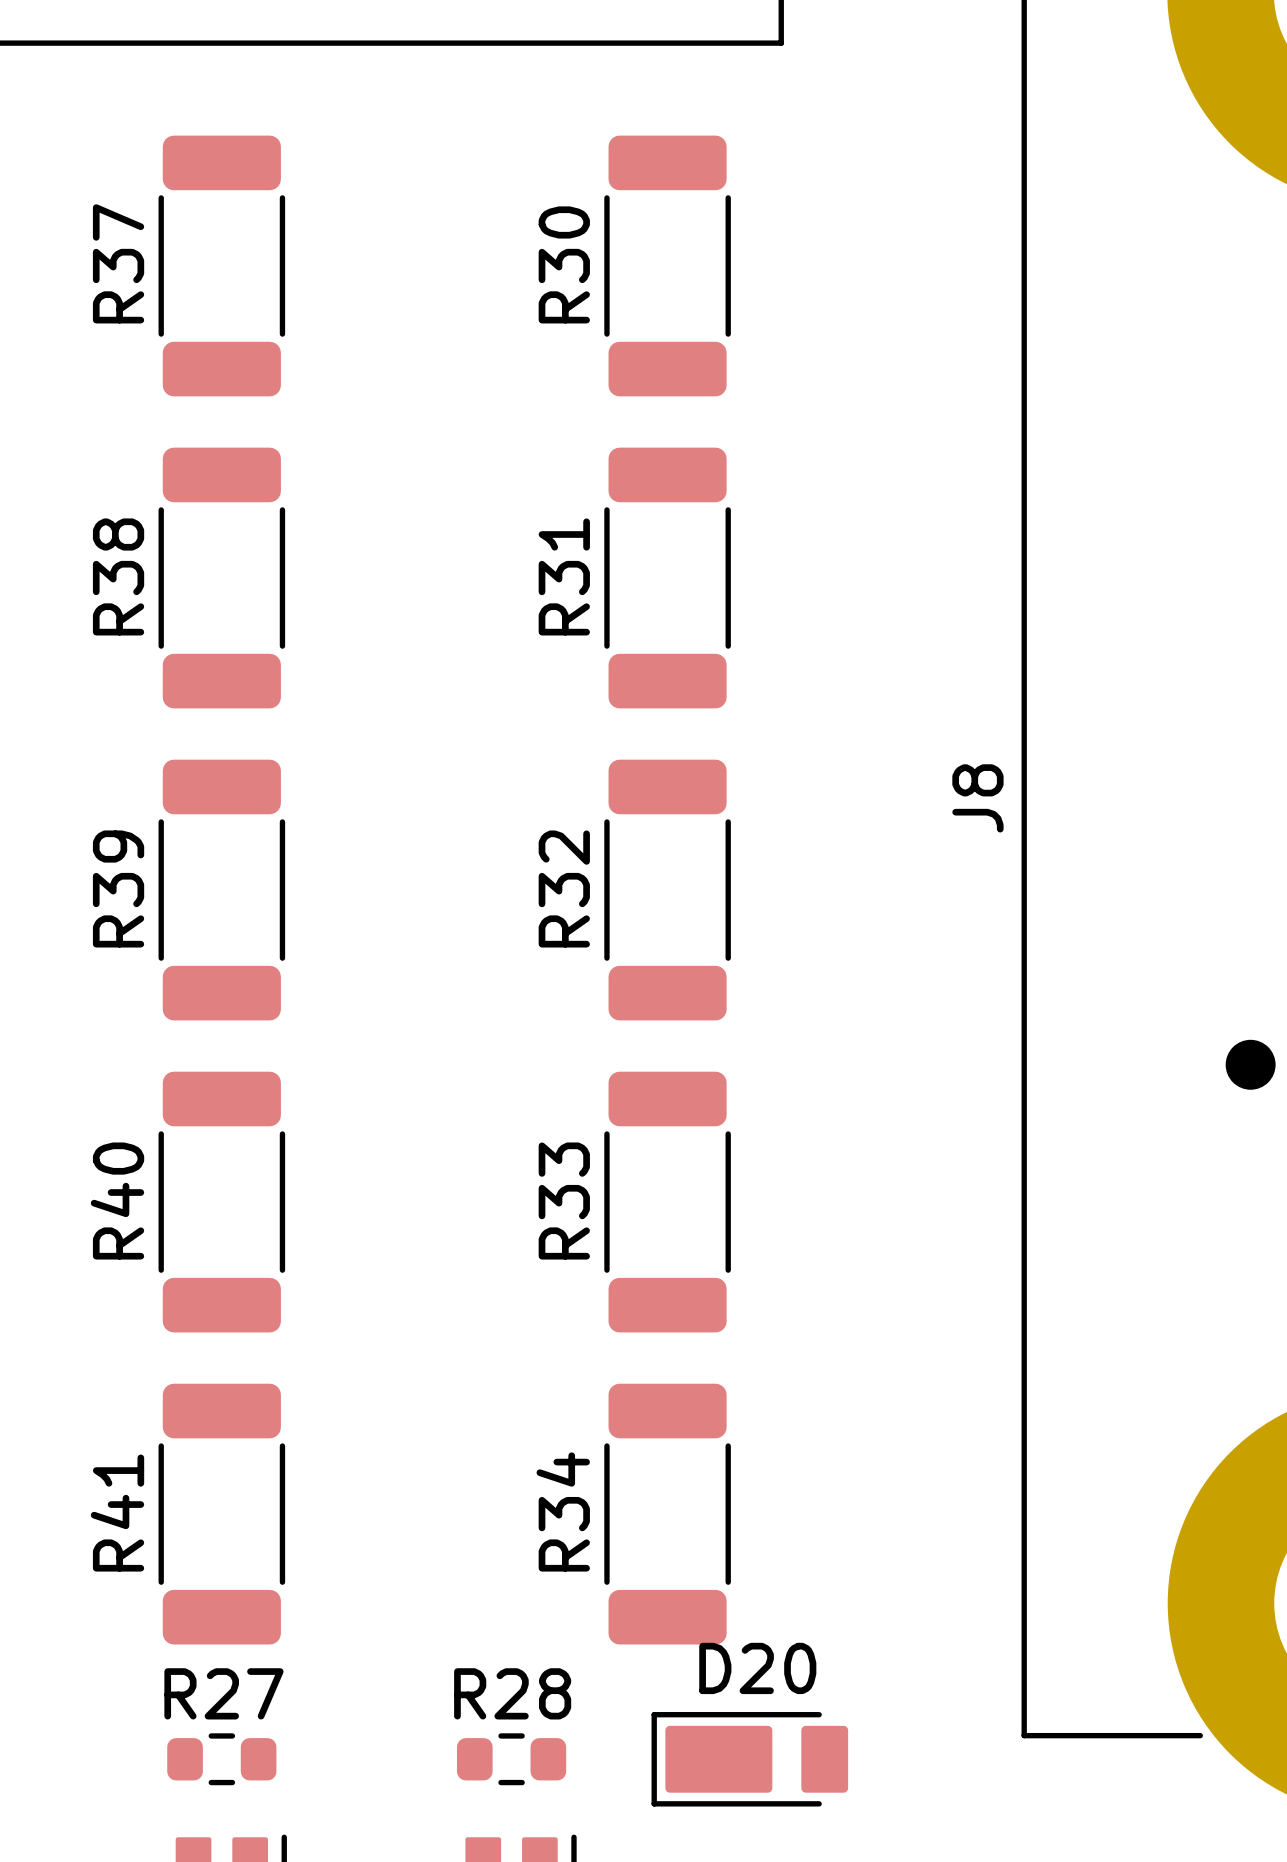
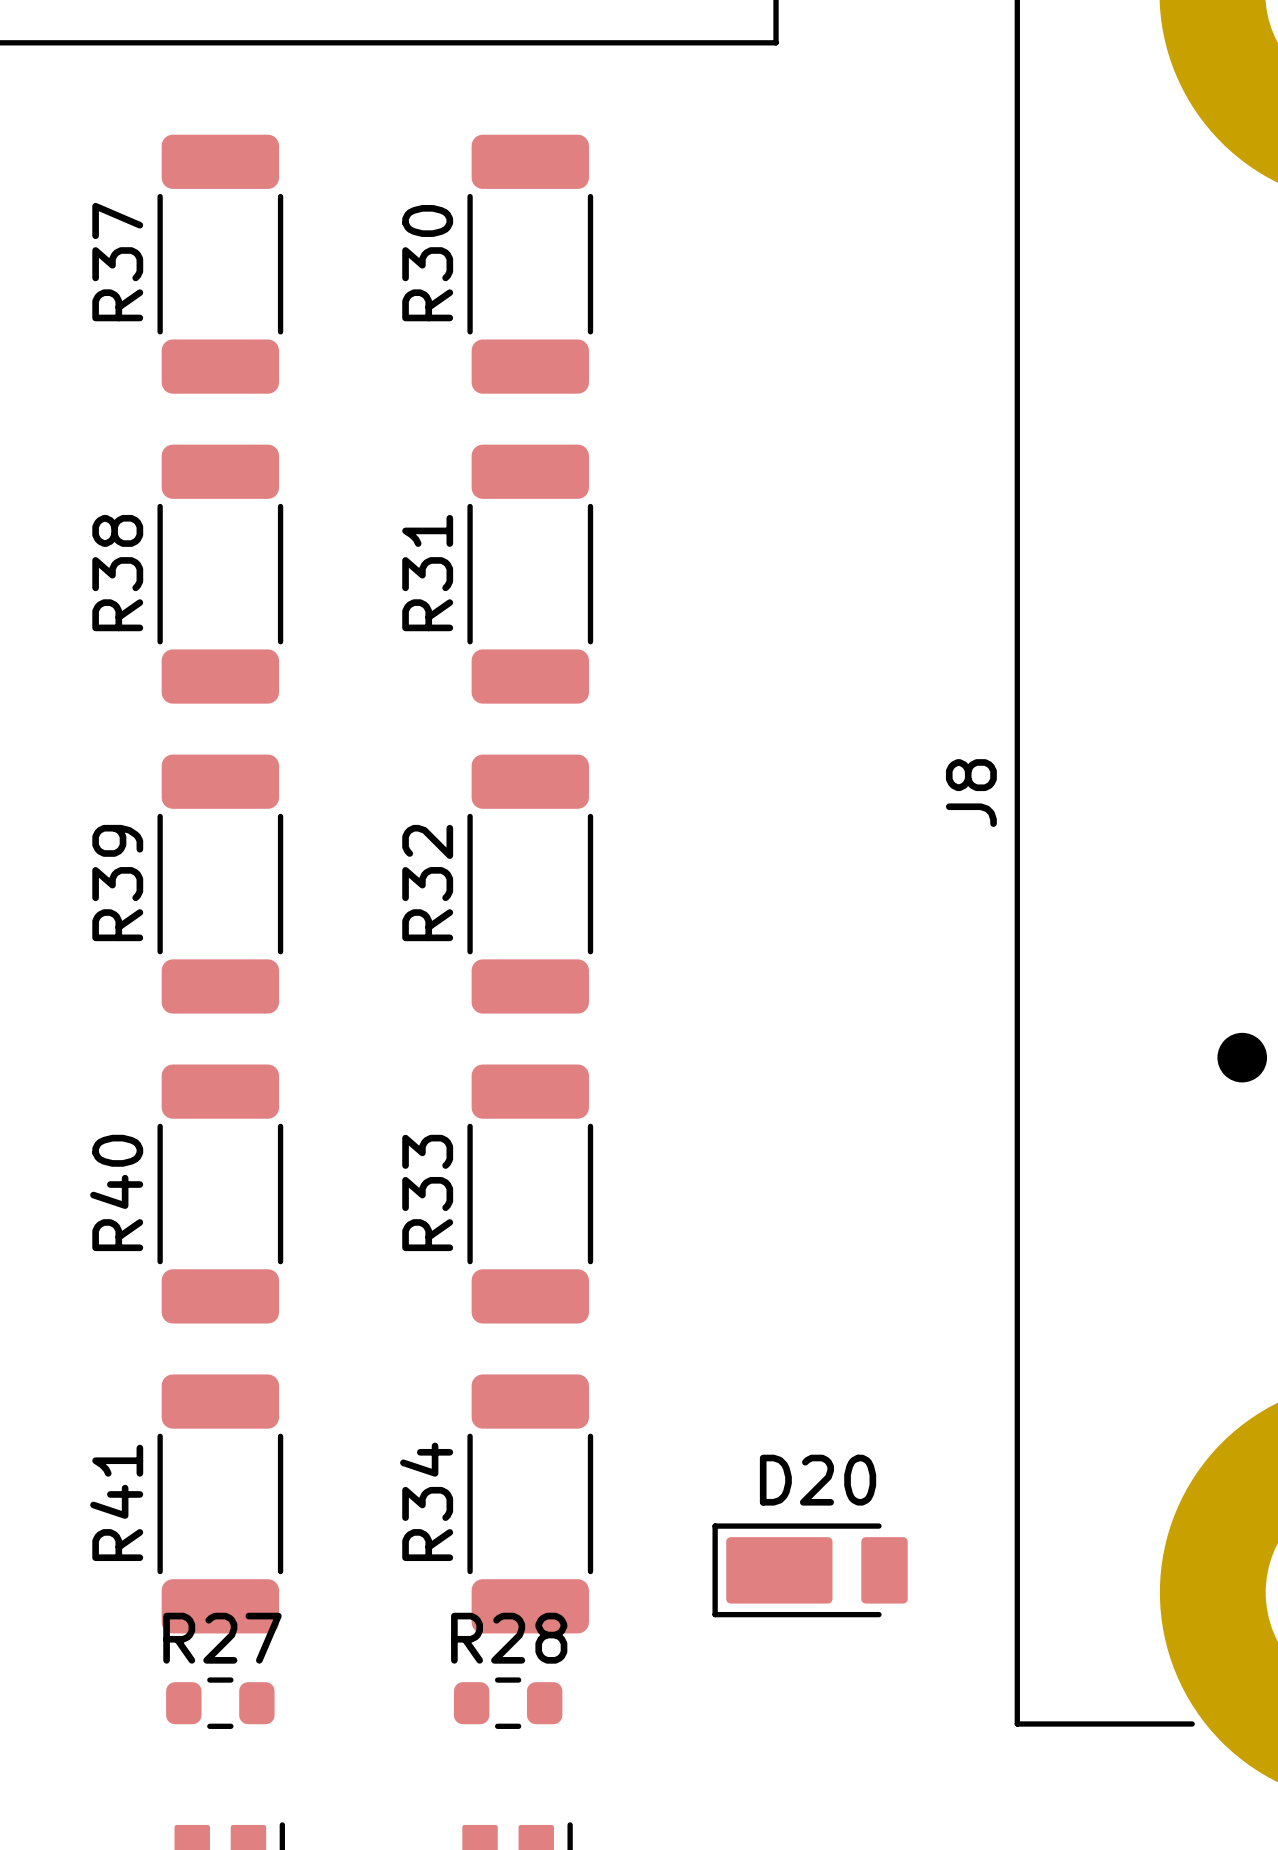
R30 position: (667, 265) -> (530, 264)
R31 position: (667, 578) -> (530, 574)
R32 position: (667, 890) -> (530, 884)
R33 position: (667, 1202) -> (530, 1194)
R34 position: (667, 1514) -> (530, 1503)
R27 position: (221, 1759) -> (220, 1703)
R28 position: (511, 1759) -> (508, 1703)
D20 position: (749, 1759) -> (810, 1570)

